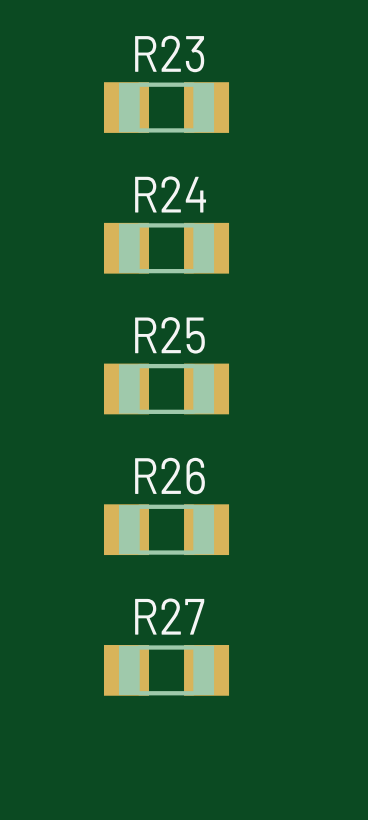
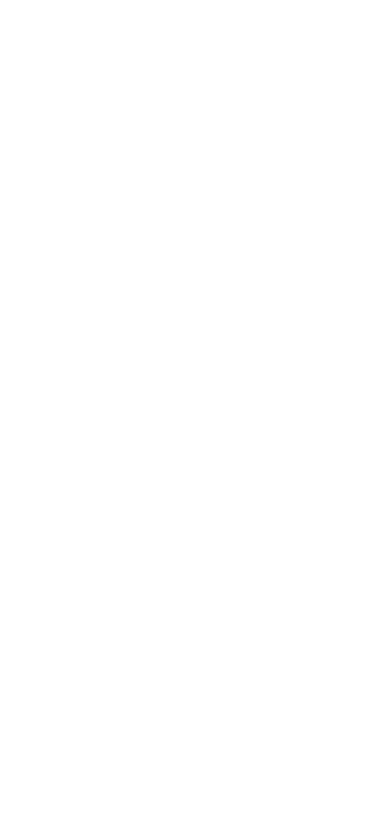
R23: (166, 107) -> none
R24: (166, 248) -> none
R25: (166, 388) -> none
R26: (166, 529) -> none
R27: (166, 670) -> none

